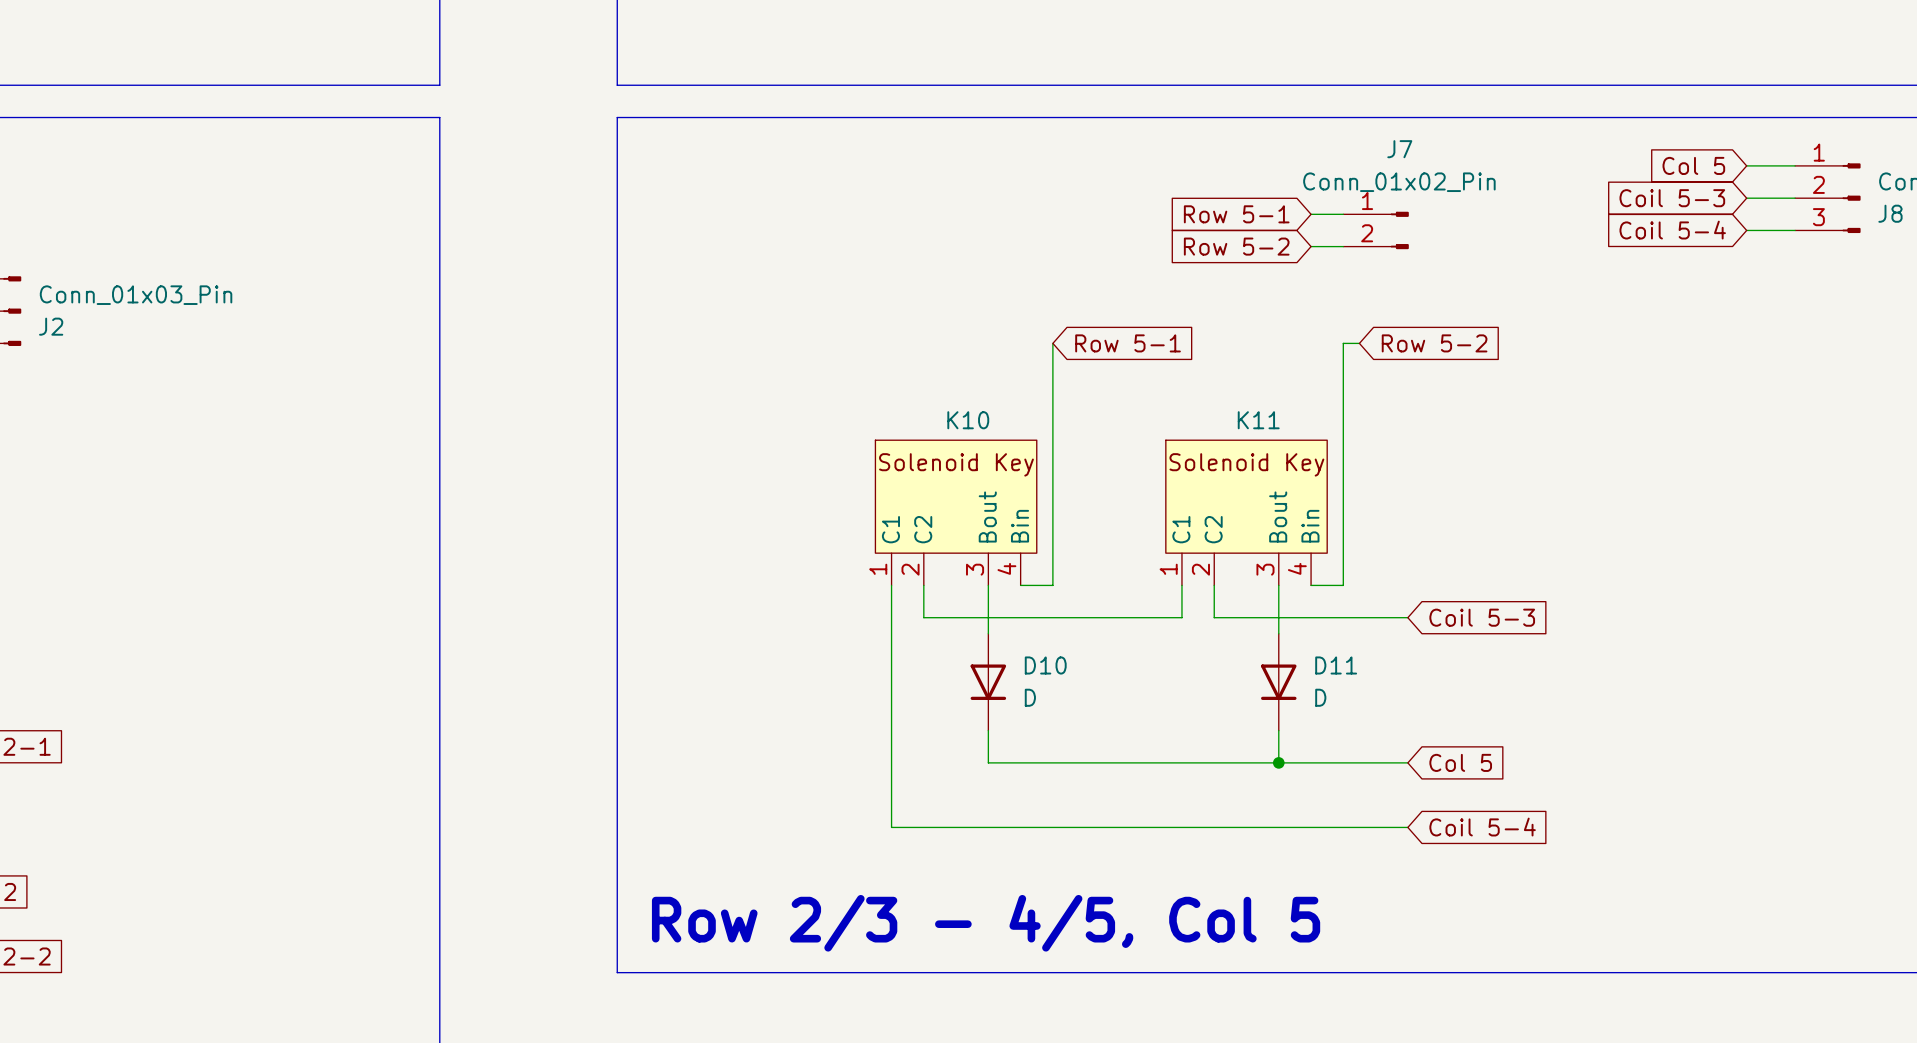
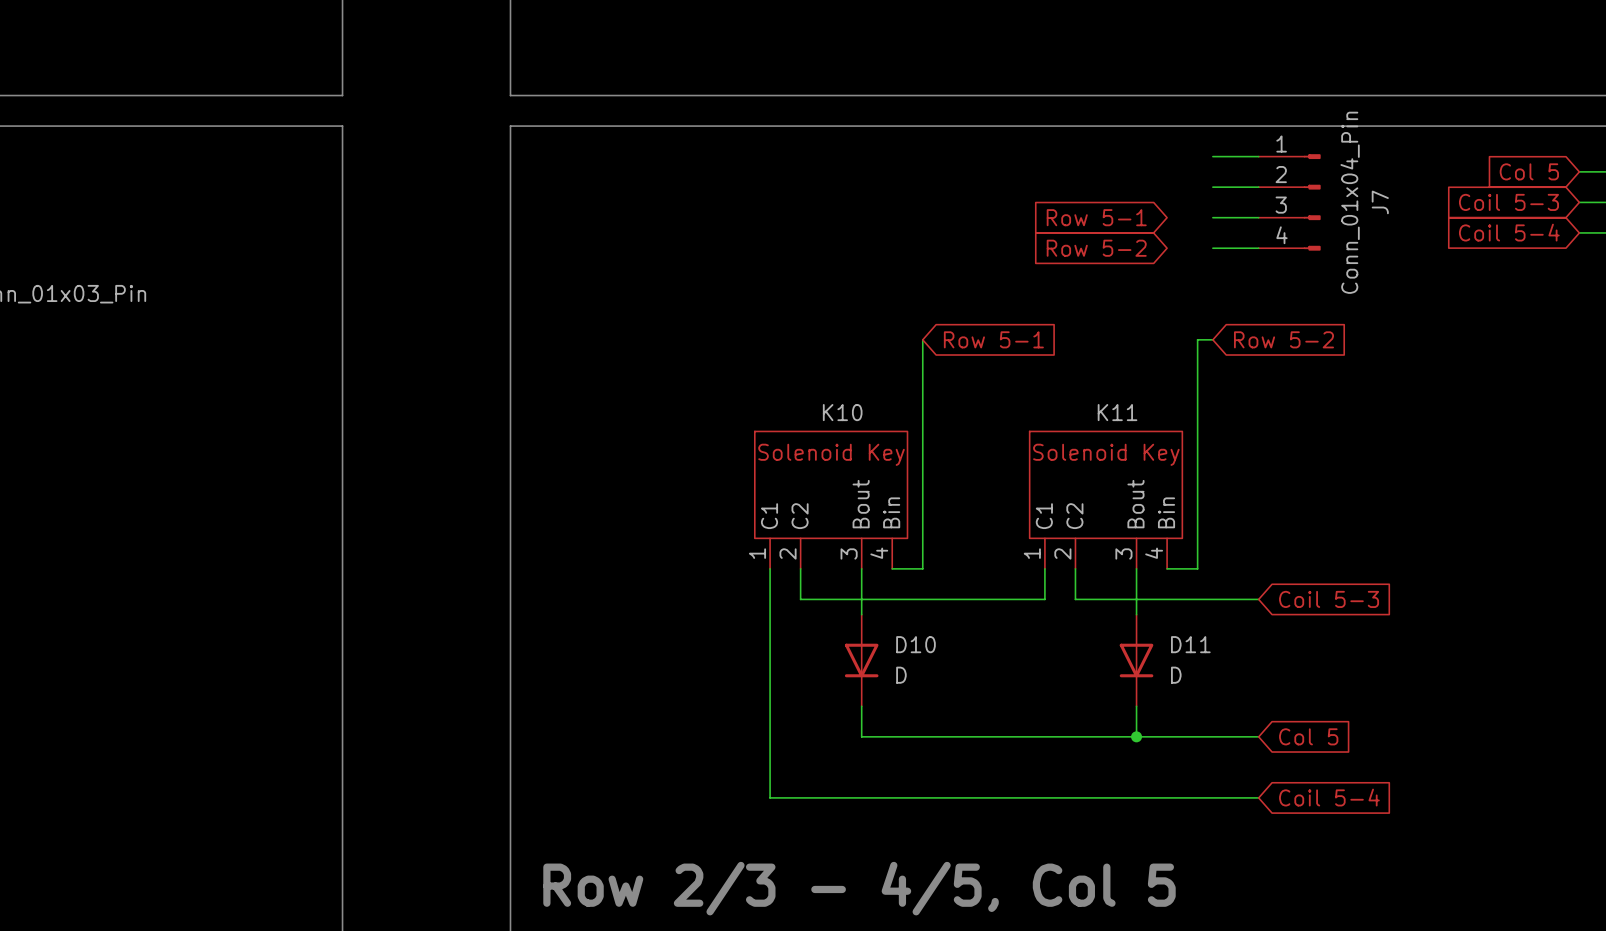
wire: none -> (1212, 156) (1258, 156)
J7 name position: J7 (1399, 149) -> J7 (1380, 202)
wire: none -> (1212, 187) (1258, 187)
J7 value: Conn_01x02_Pin (1399, 182) -> Conn_01x04_Pin (1350, 202)
J7 symbol: [1343, 211, 1409, 250] -> [1258, 154, 1321, 251]
wire: (1311, 214) (1343, 214) -> none
wire: (1311, 246) (1343, 246) -> none

